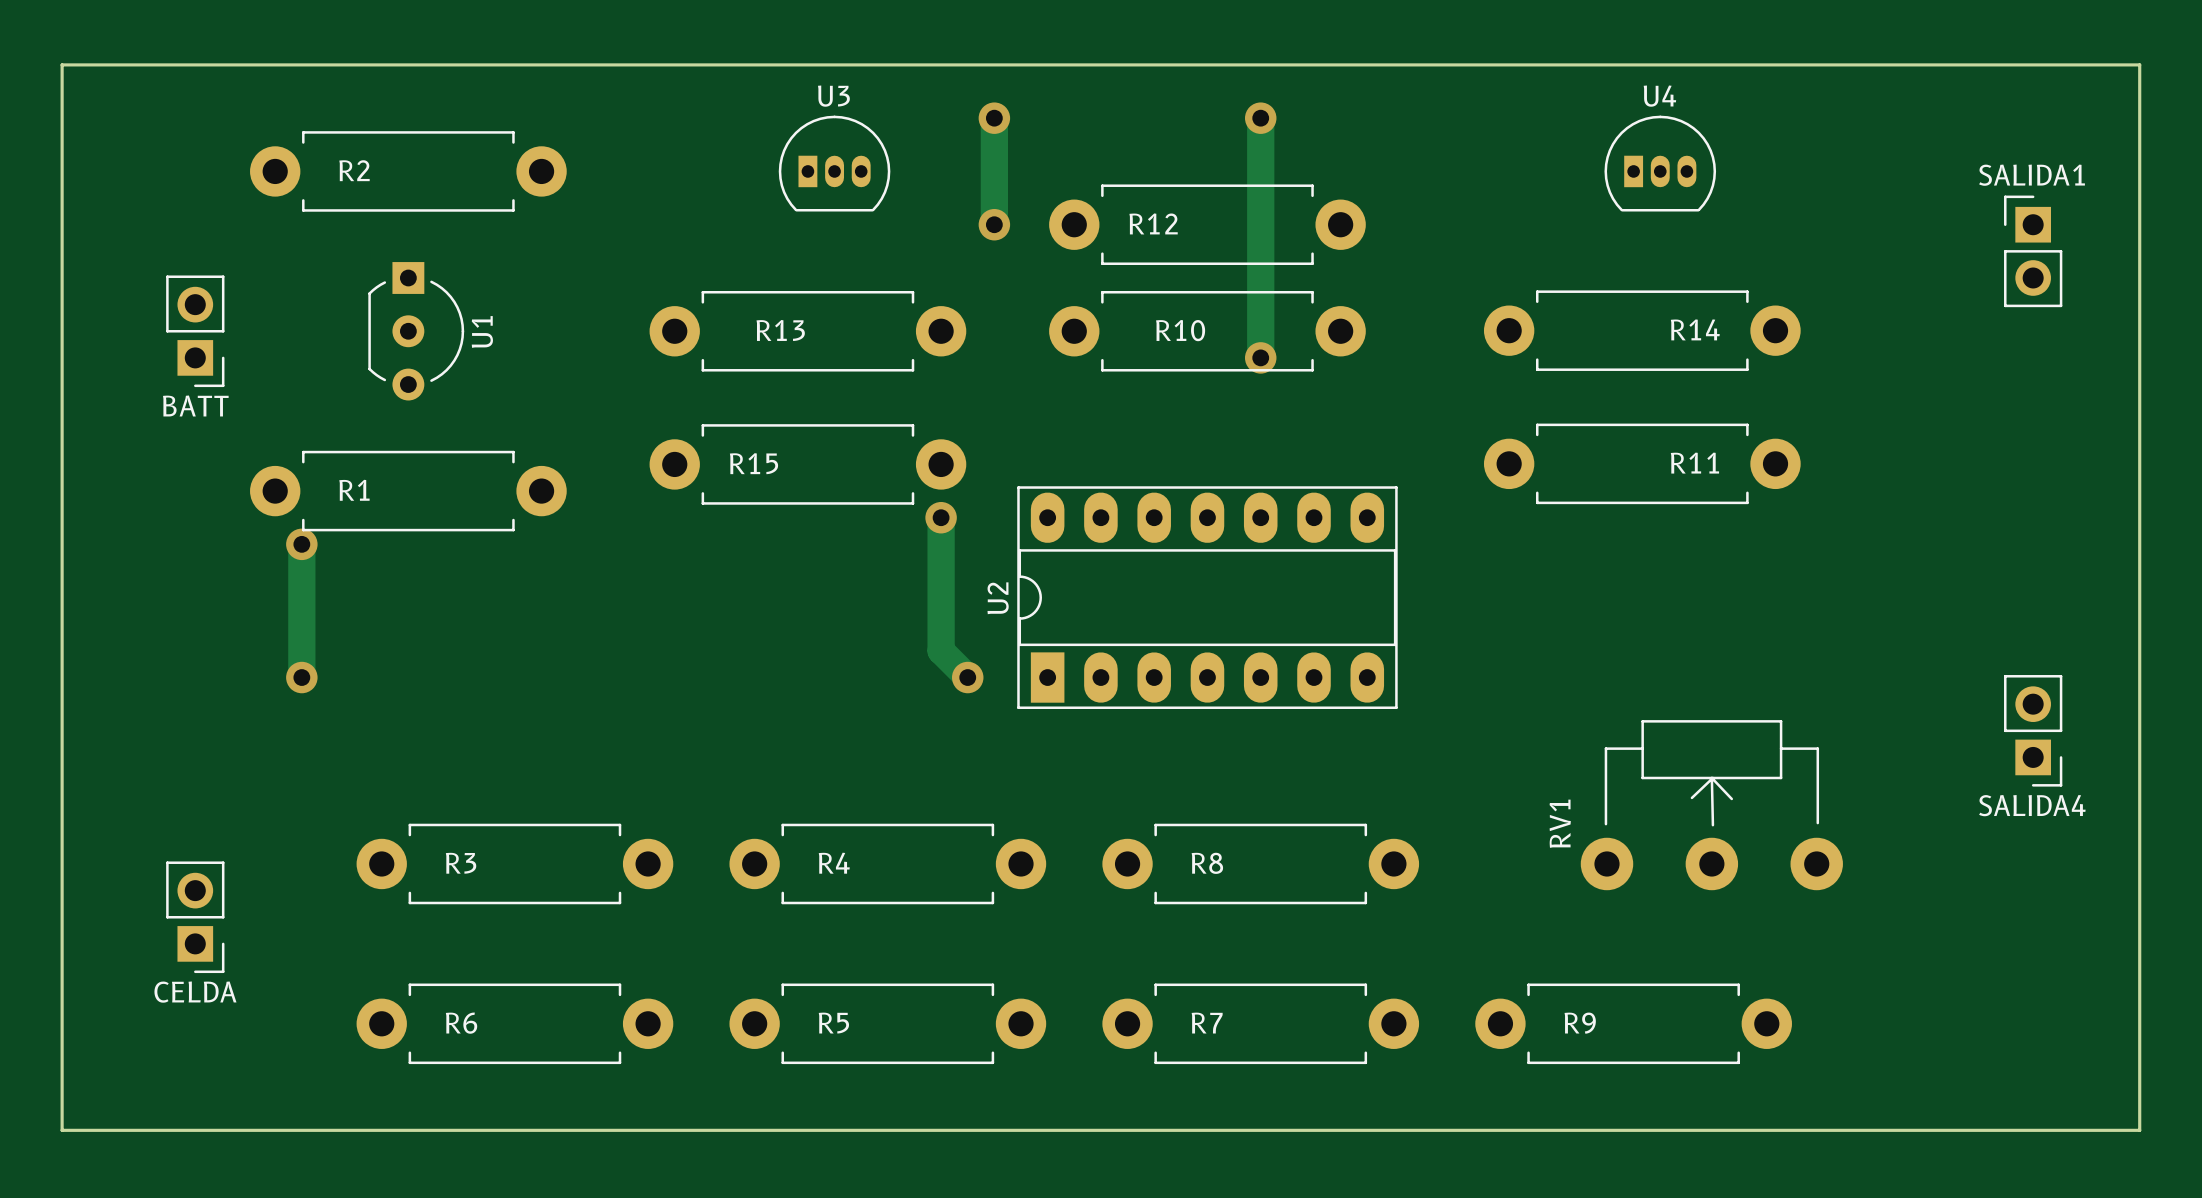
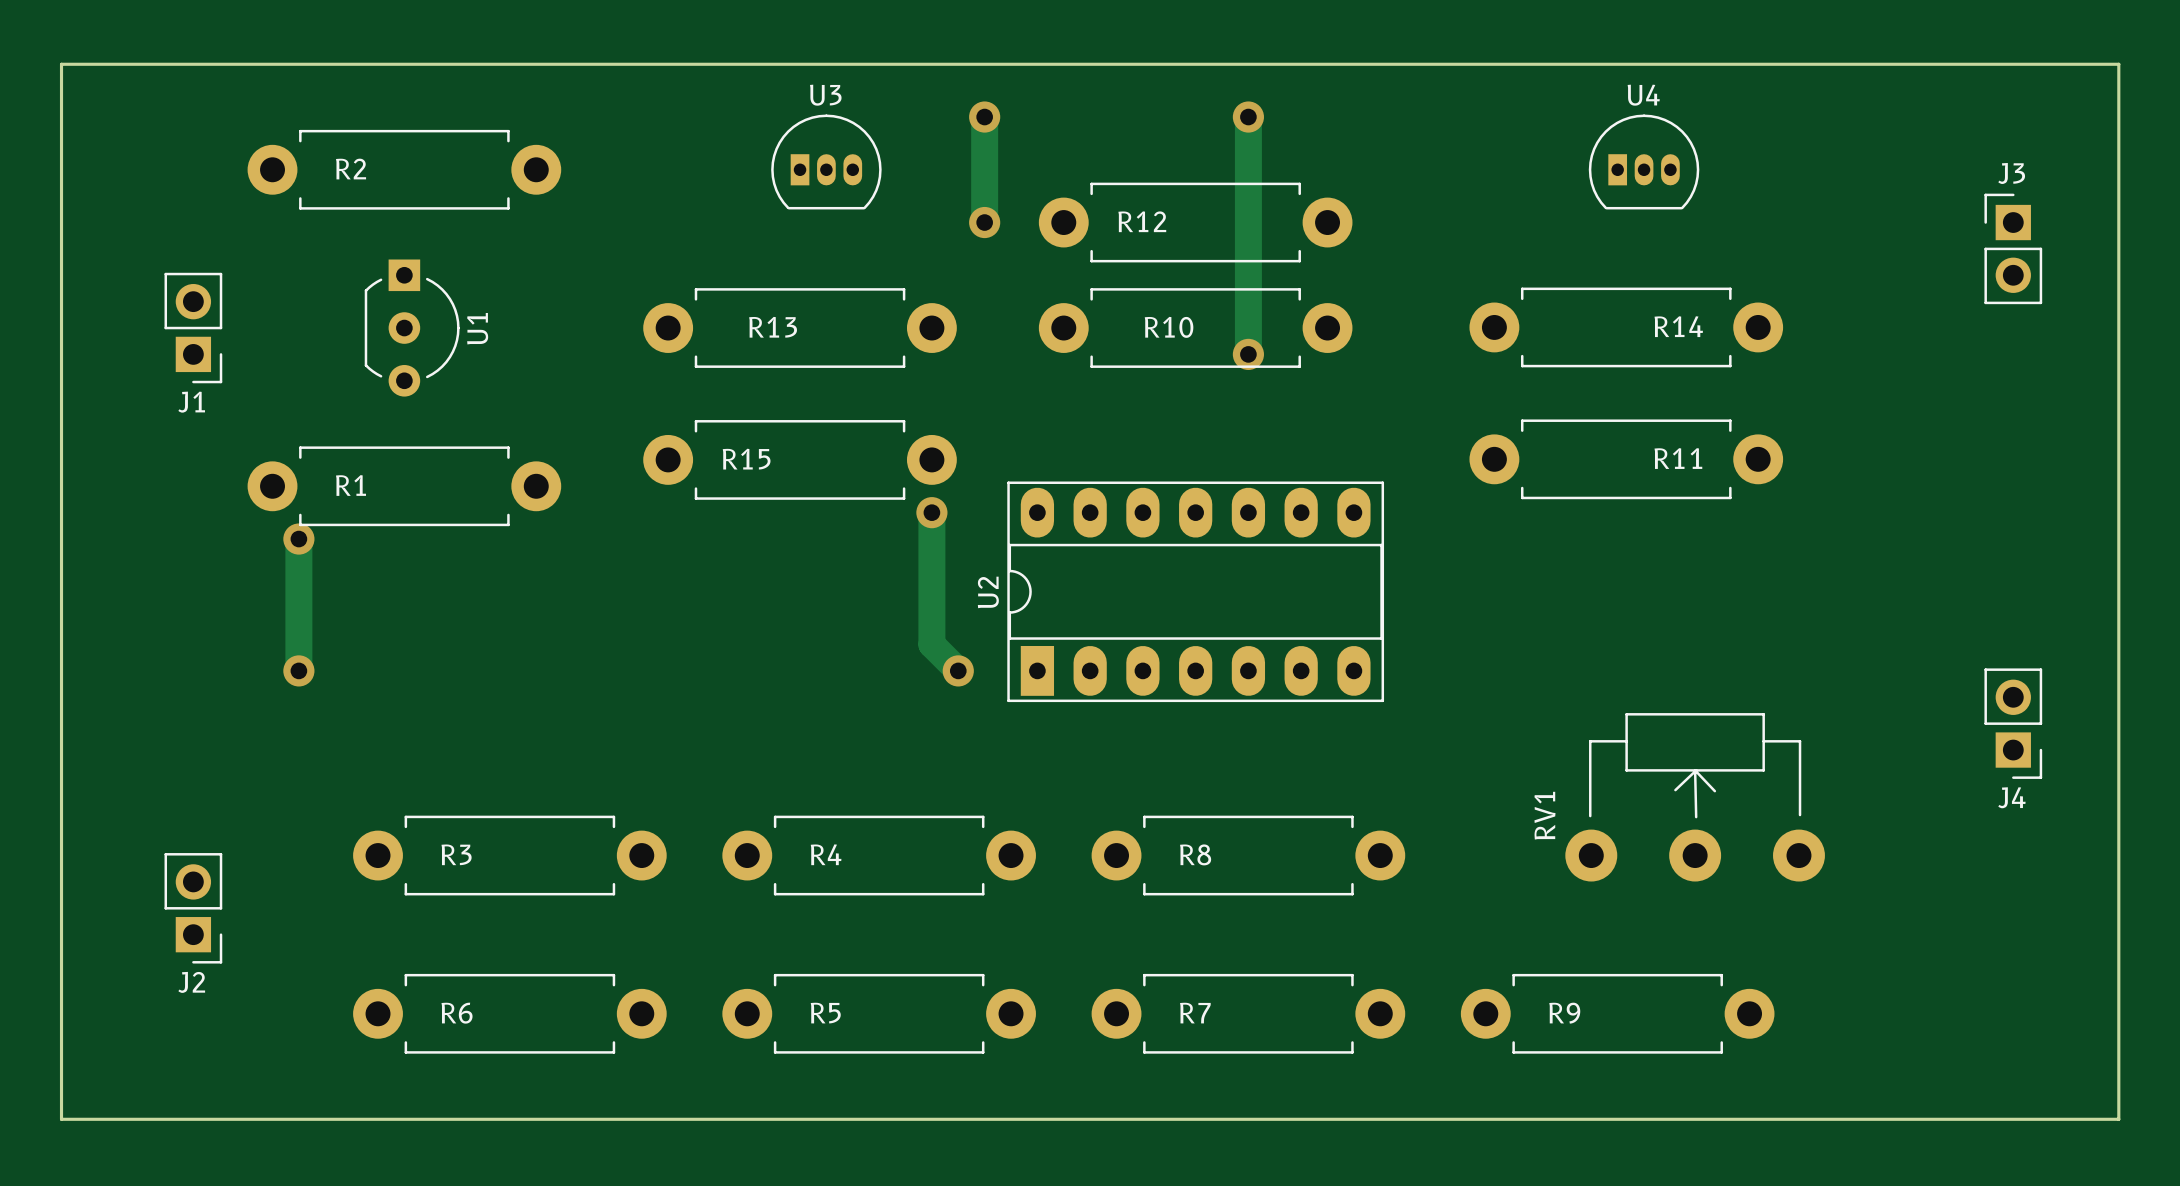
SALIDA1 name: SALIDA1 (2032, 175) -> J3 (2011, 173)
BATT name: BATT (195, 405) -> J1 (191, 402)
SALIDA4 name: SALIDA4 (2032, 805) -> J4 (2011, 797)
CELDA name: CELDA (195, 992) -> J2 (191, 982)

